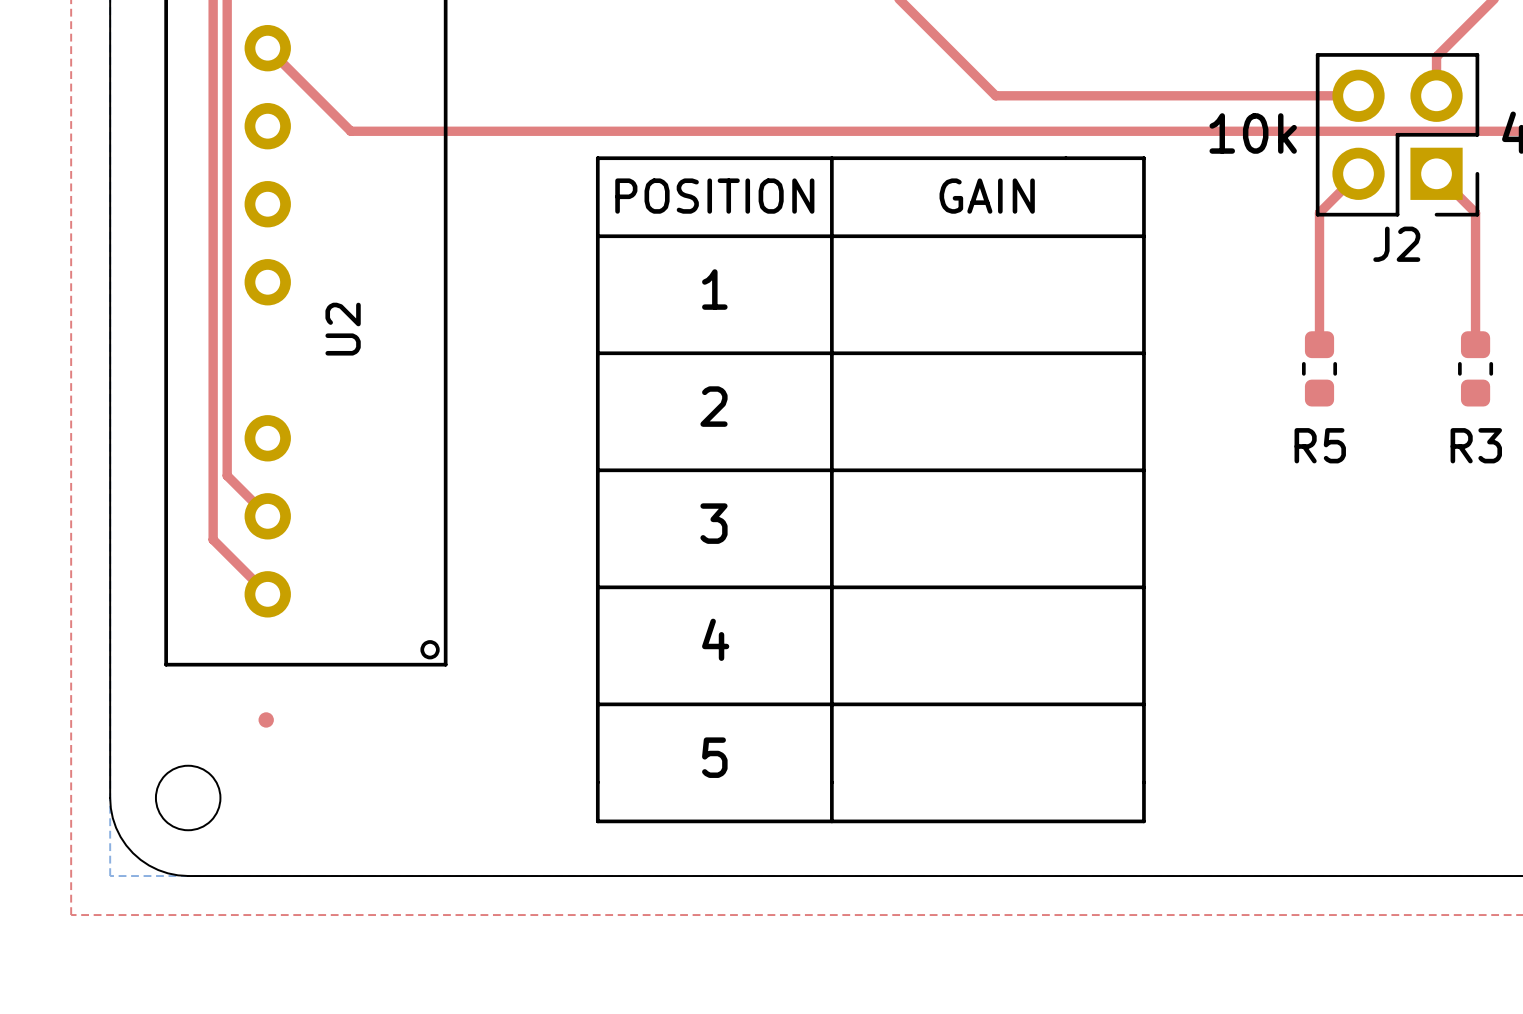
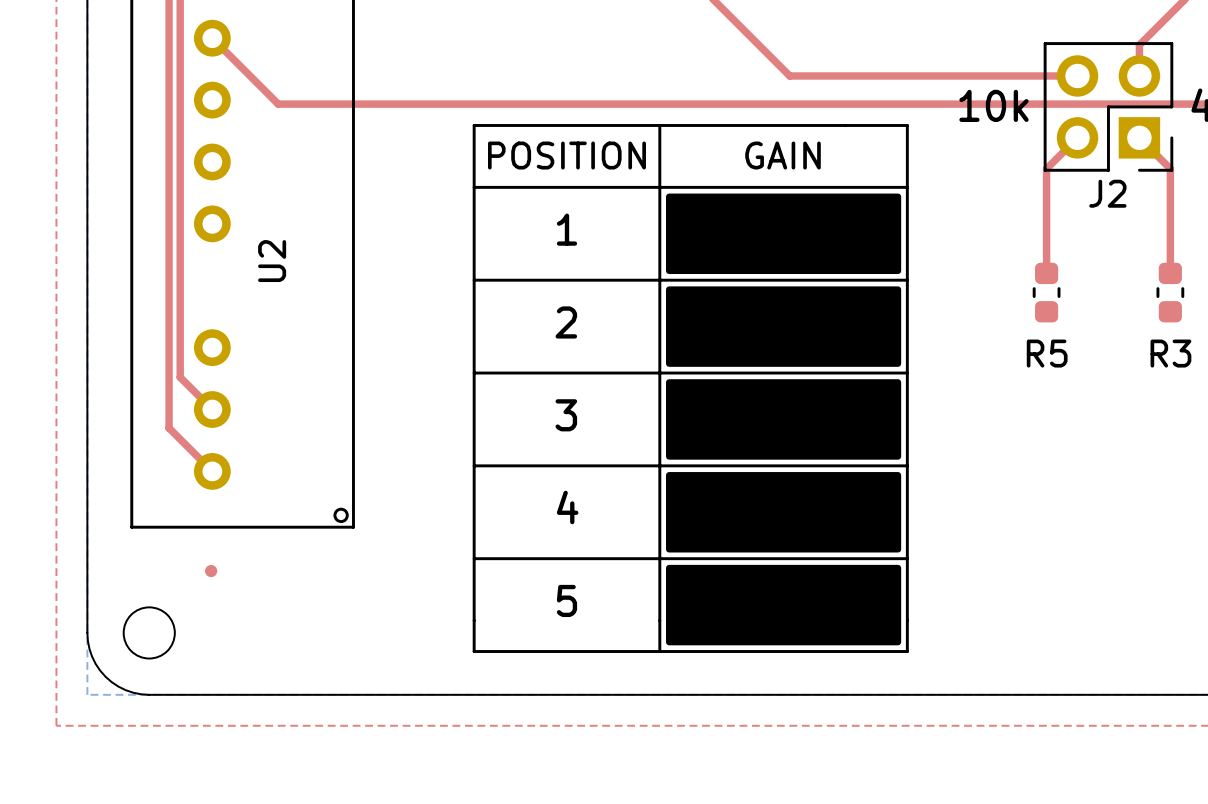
drawing: none -> [666, 193, 902, 646]

